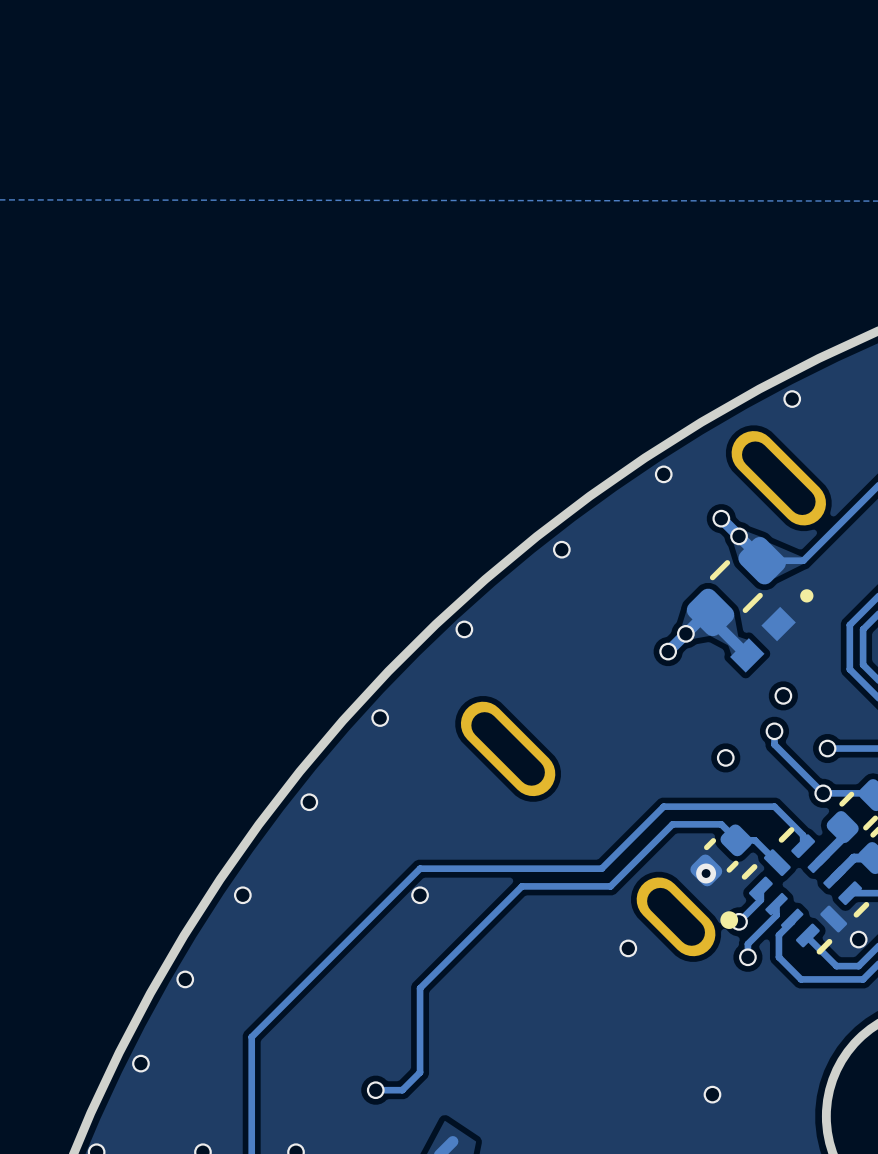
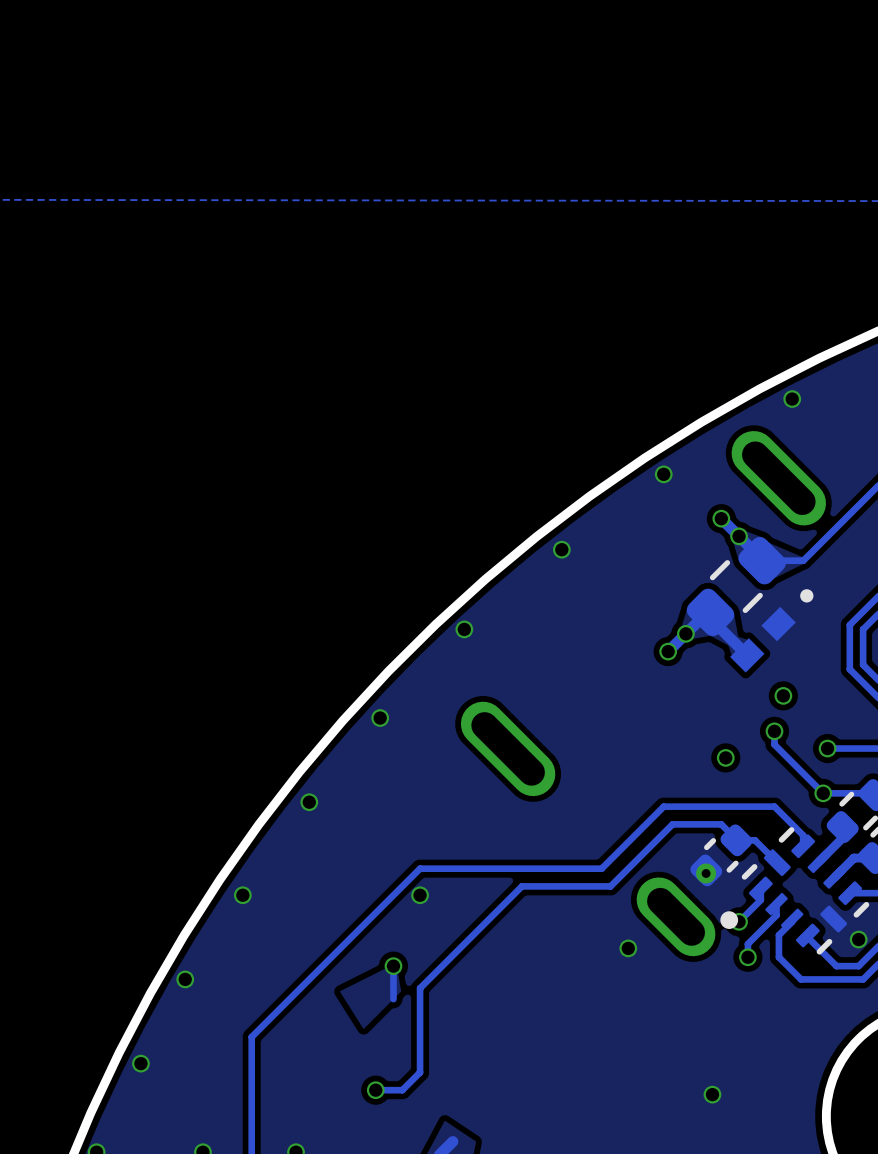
track: none -> (393, 966) (393, 999)
via: none -> (393, 966)

